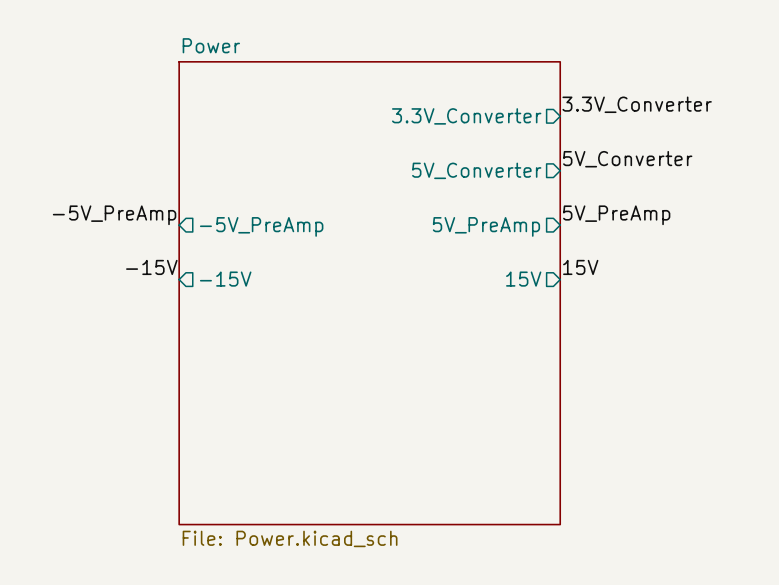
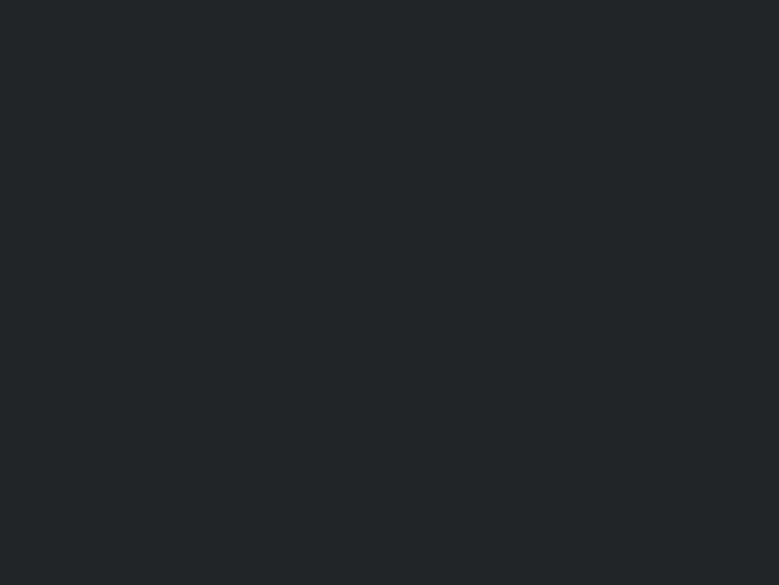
label: 3.3V_Converter (637, 104) -> none
sheet pin: 3.3V_Converter (466, 116) -> none
label: 5V_Converter (627, 159) -> none
sheet pin: 5V_Converter (476, 170) -> none
label: -5V_PreAmp (114, 215) -> none
label: 5V_PreAmp (616, 215) -> none
sheet pin: -5V_PreAmp (261, 226) -> none
sheet pin: 5V_PreAmp (486, 226) -> none
label: -15V (151, 267) -> none
label: 15V (580, 267) -> none
sheet pin: -15V (225, 279) -> none
sheet pin: 15V (523, 279) -> none
sheet Power: File: Power.kicad_sch (369, 293) -> none

